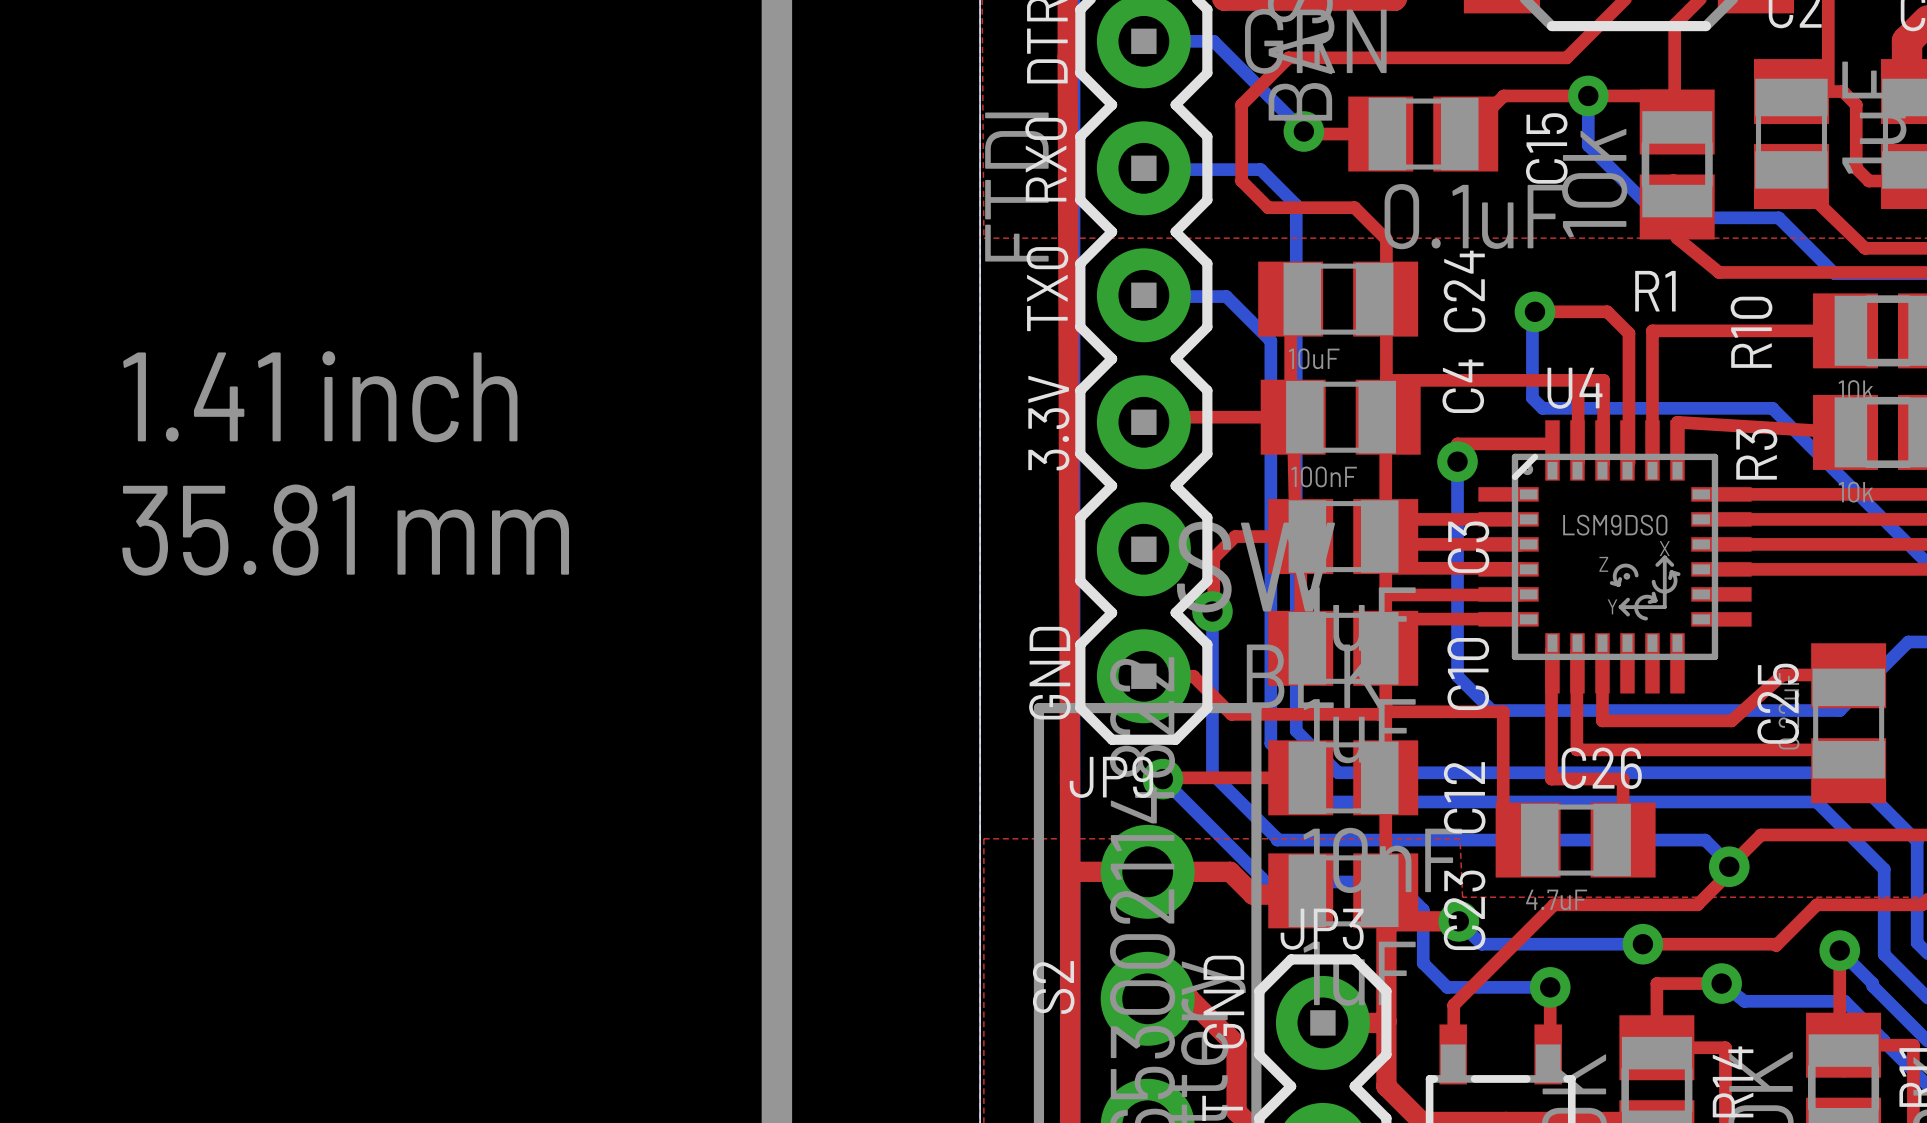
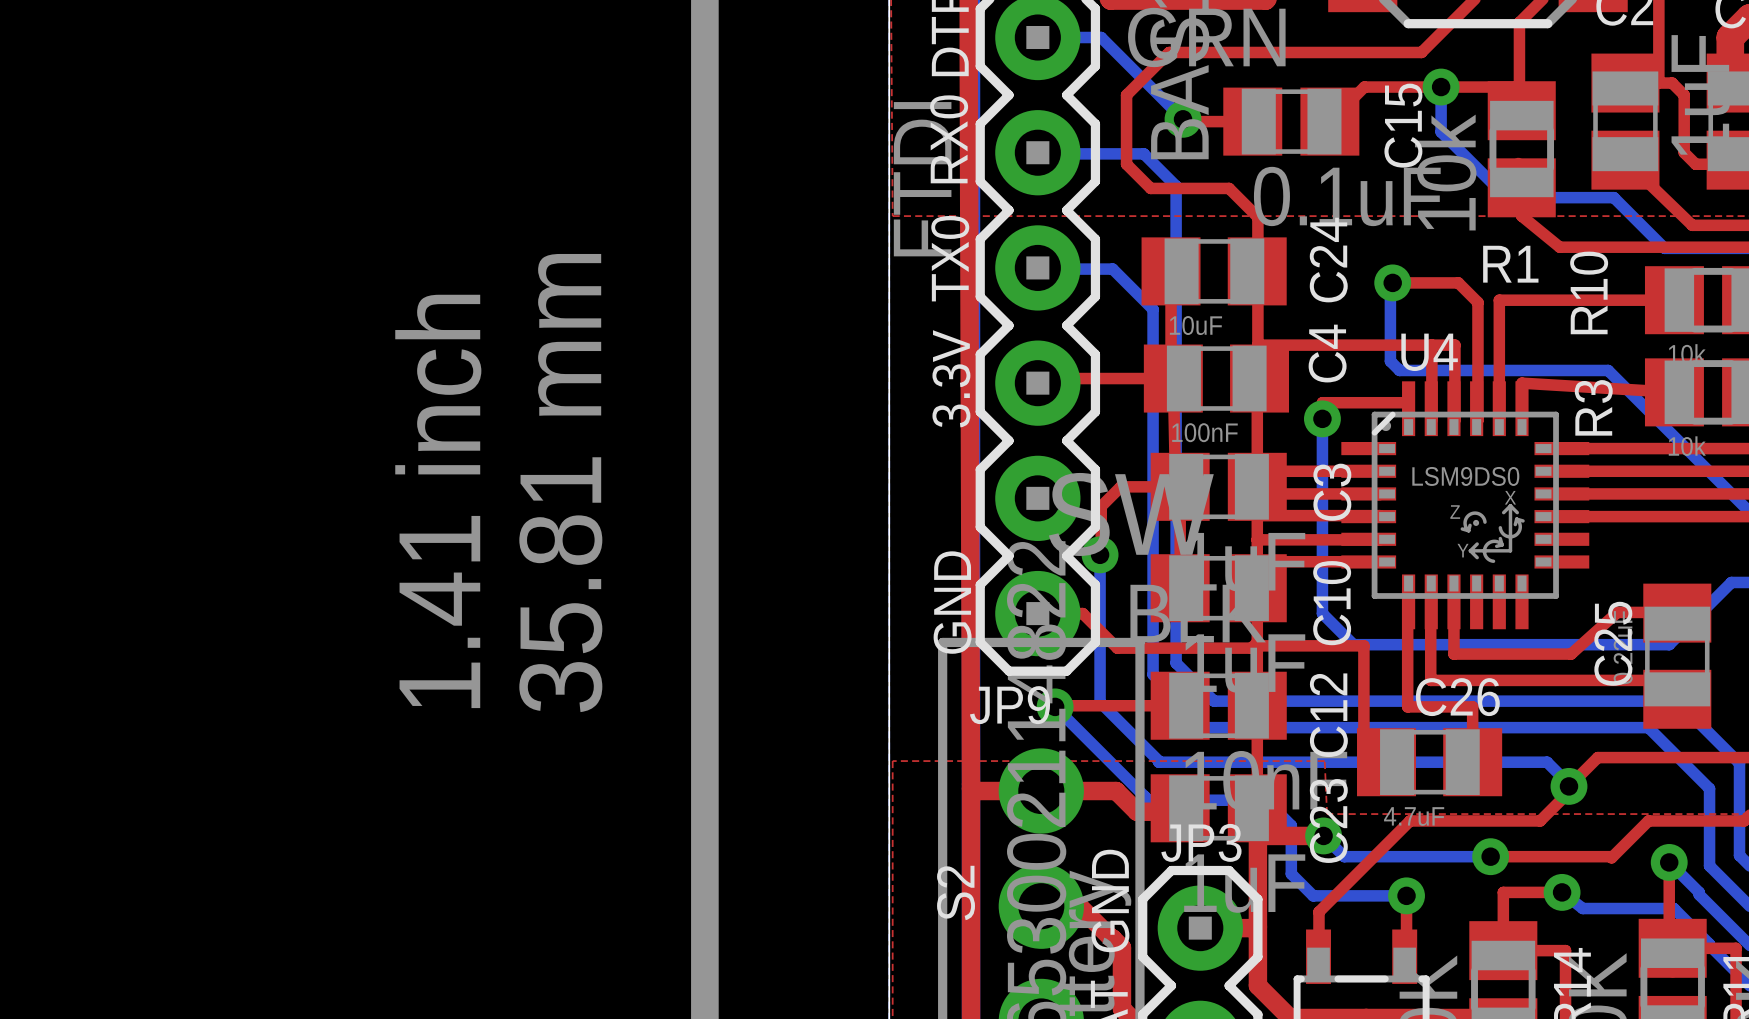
text rotation: 0° (320, 396) -> 90° counterclockwise (438, 501)
text rotation: 0° (345, 530) -> 90° counterclockwise (560, 483)

